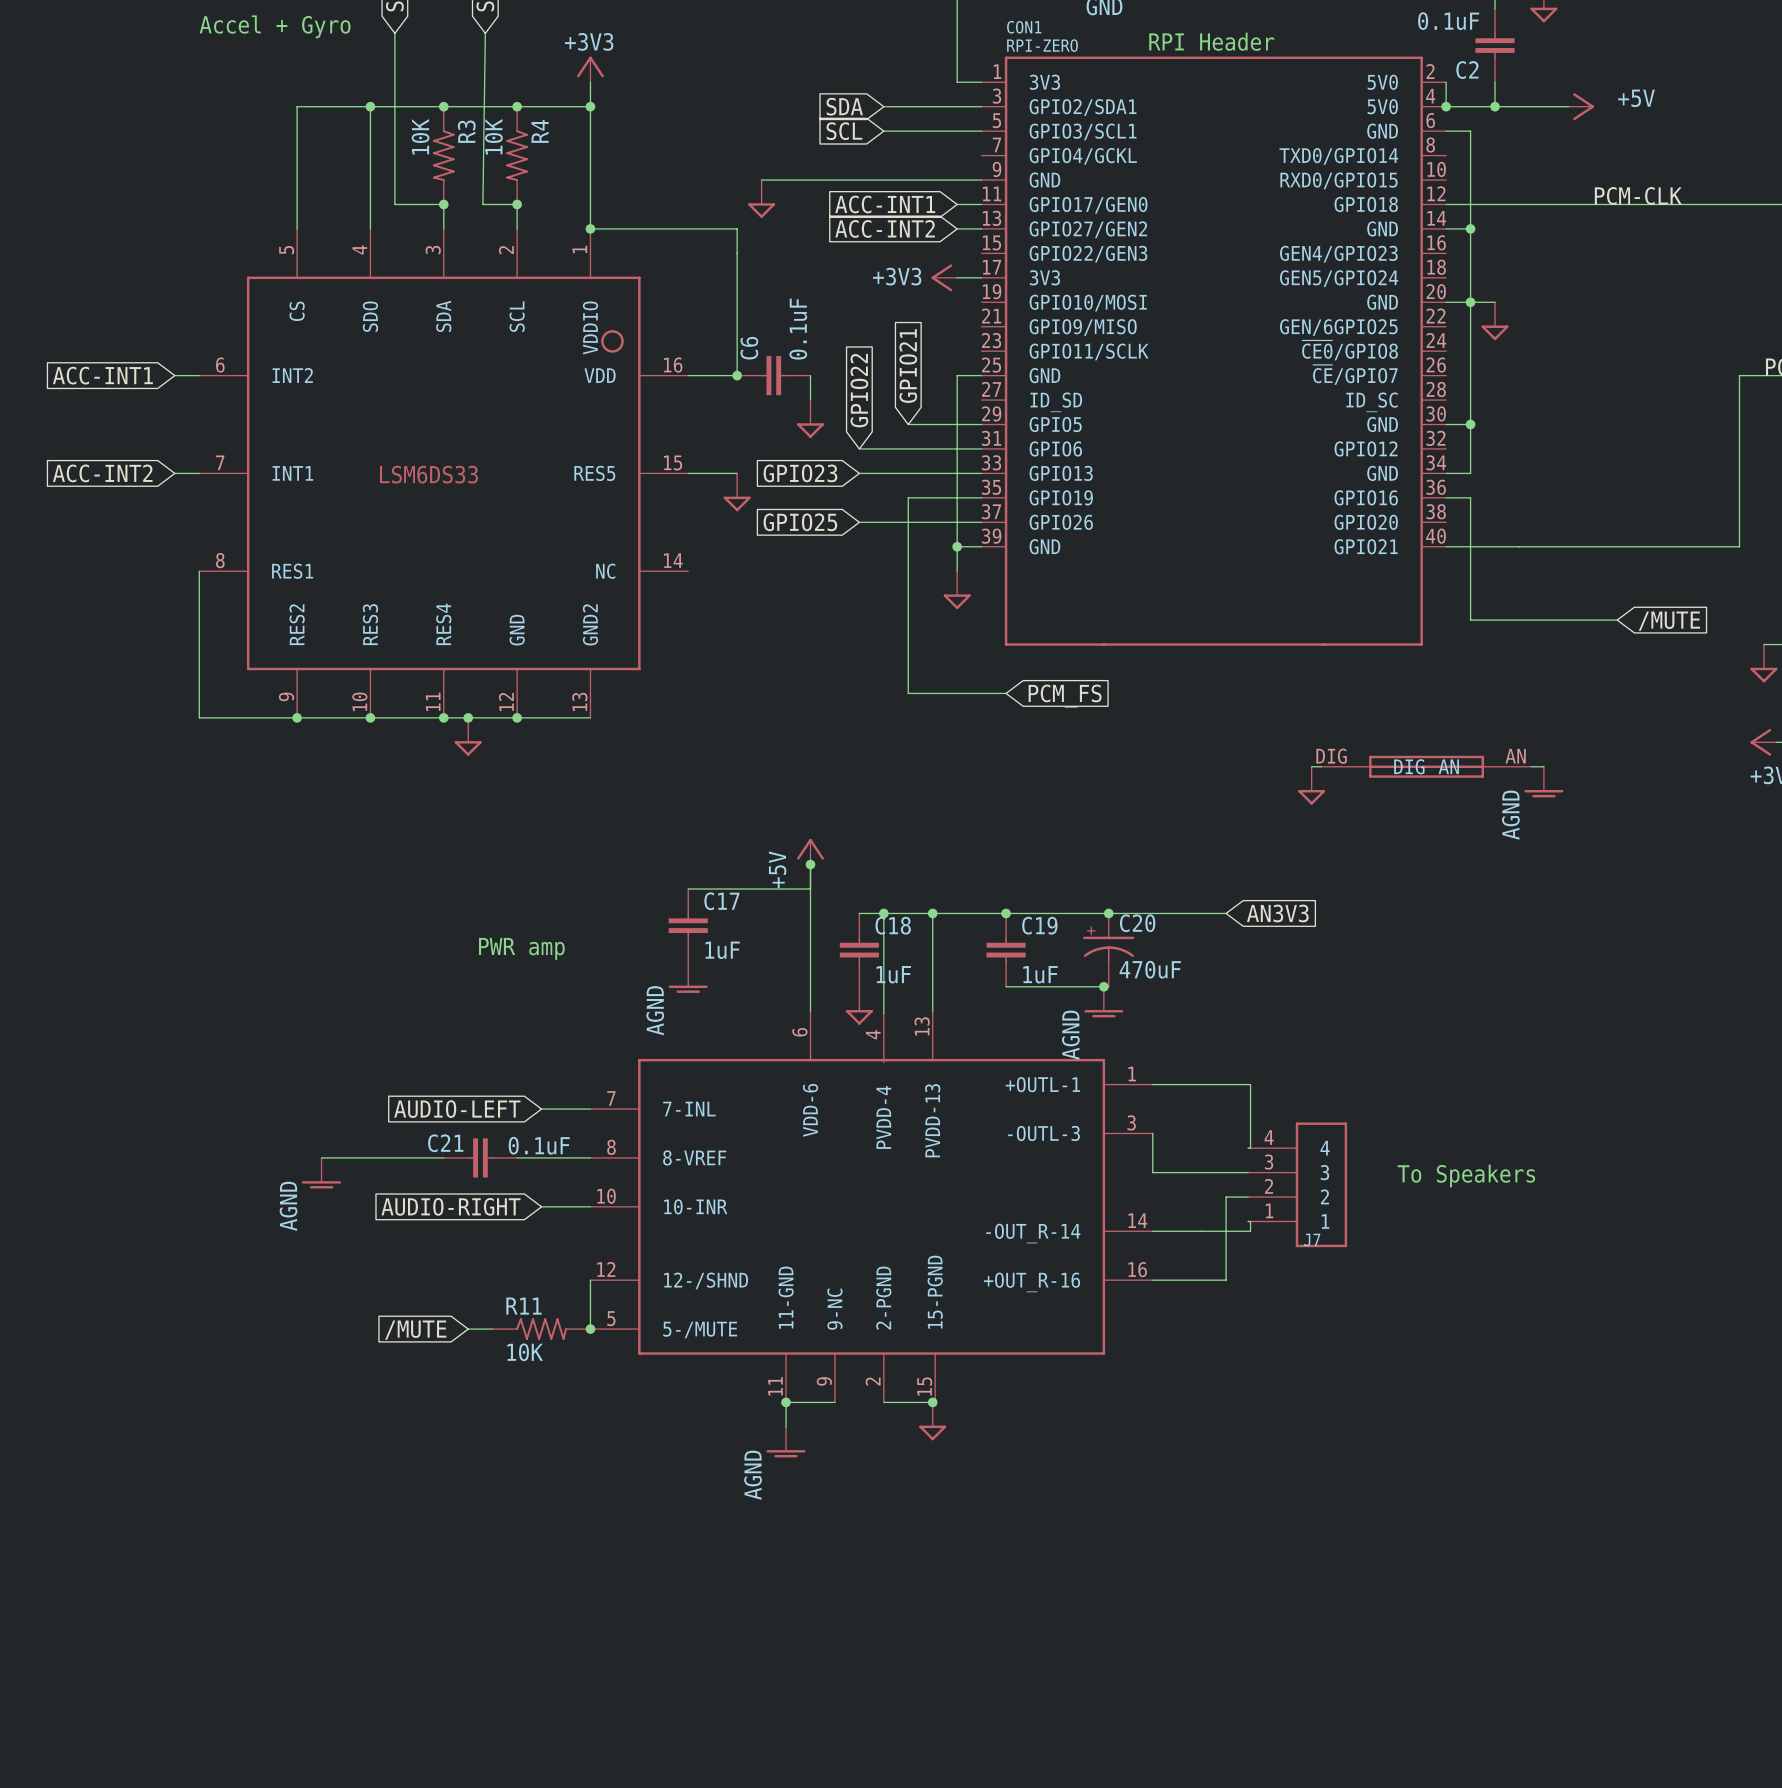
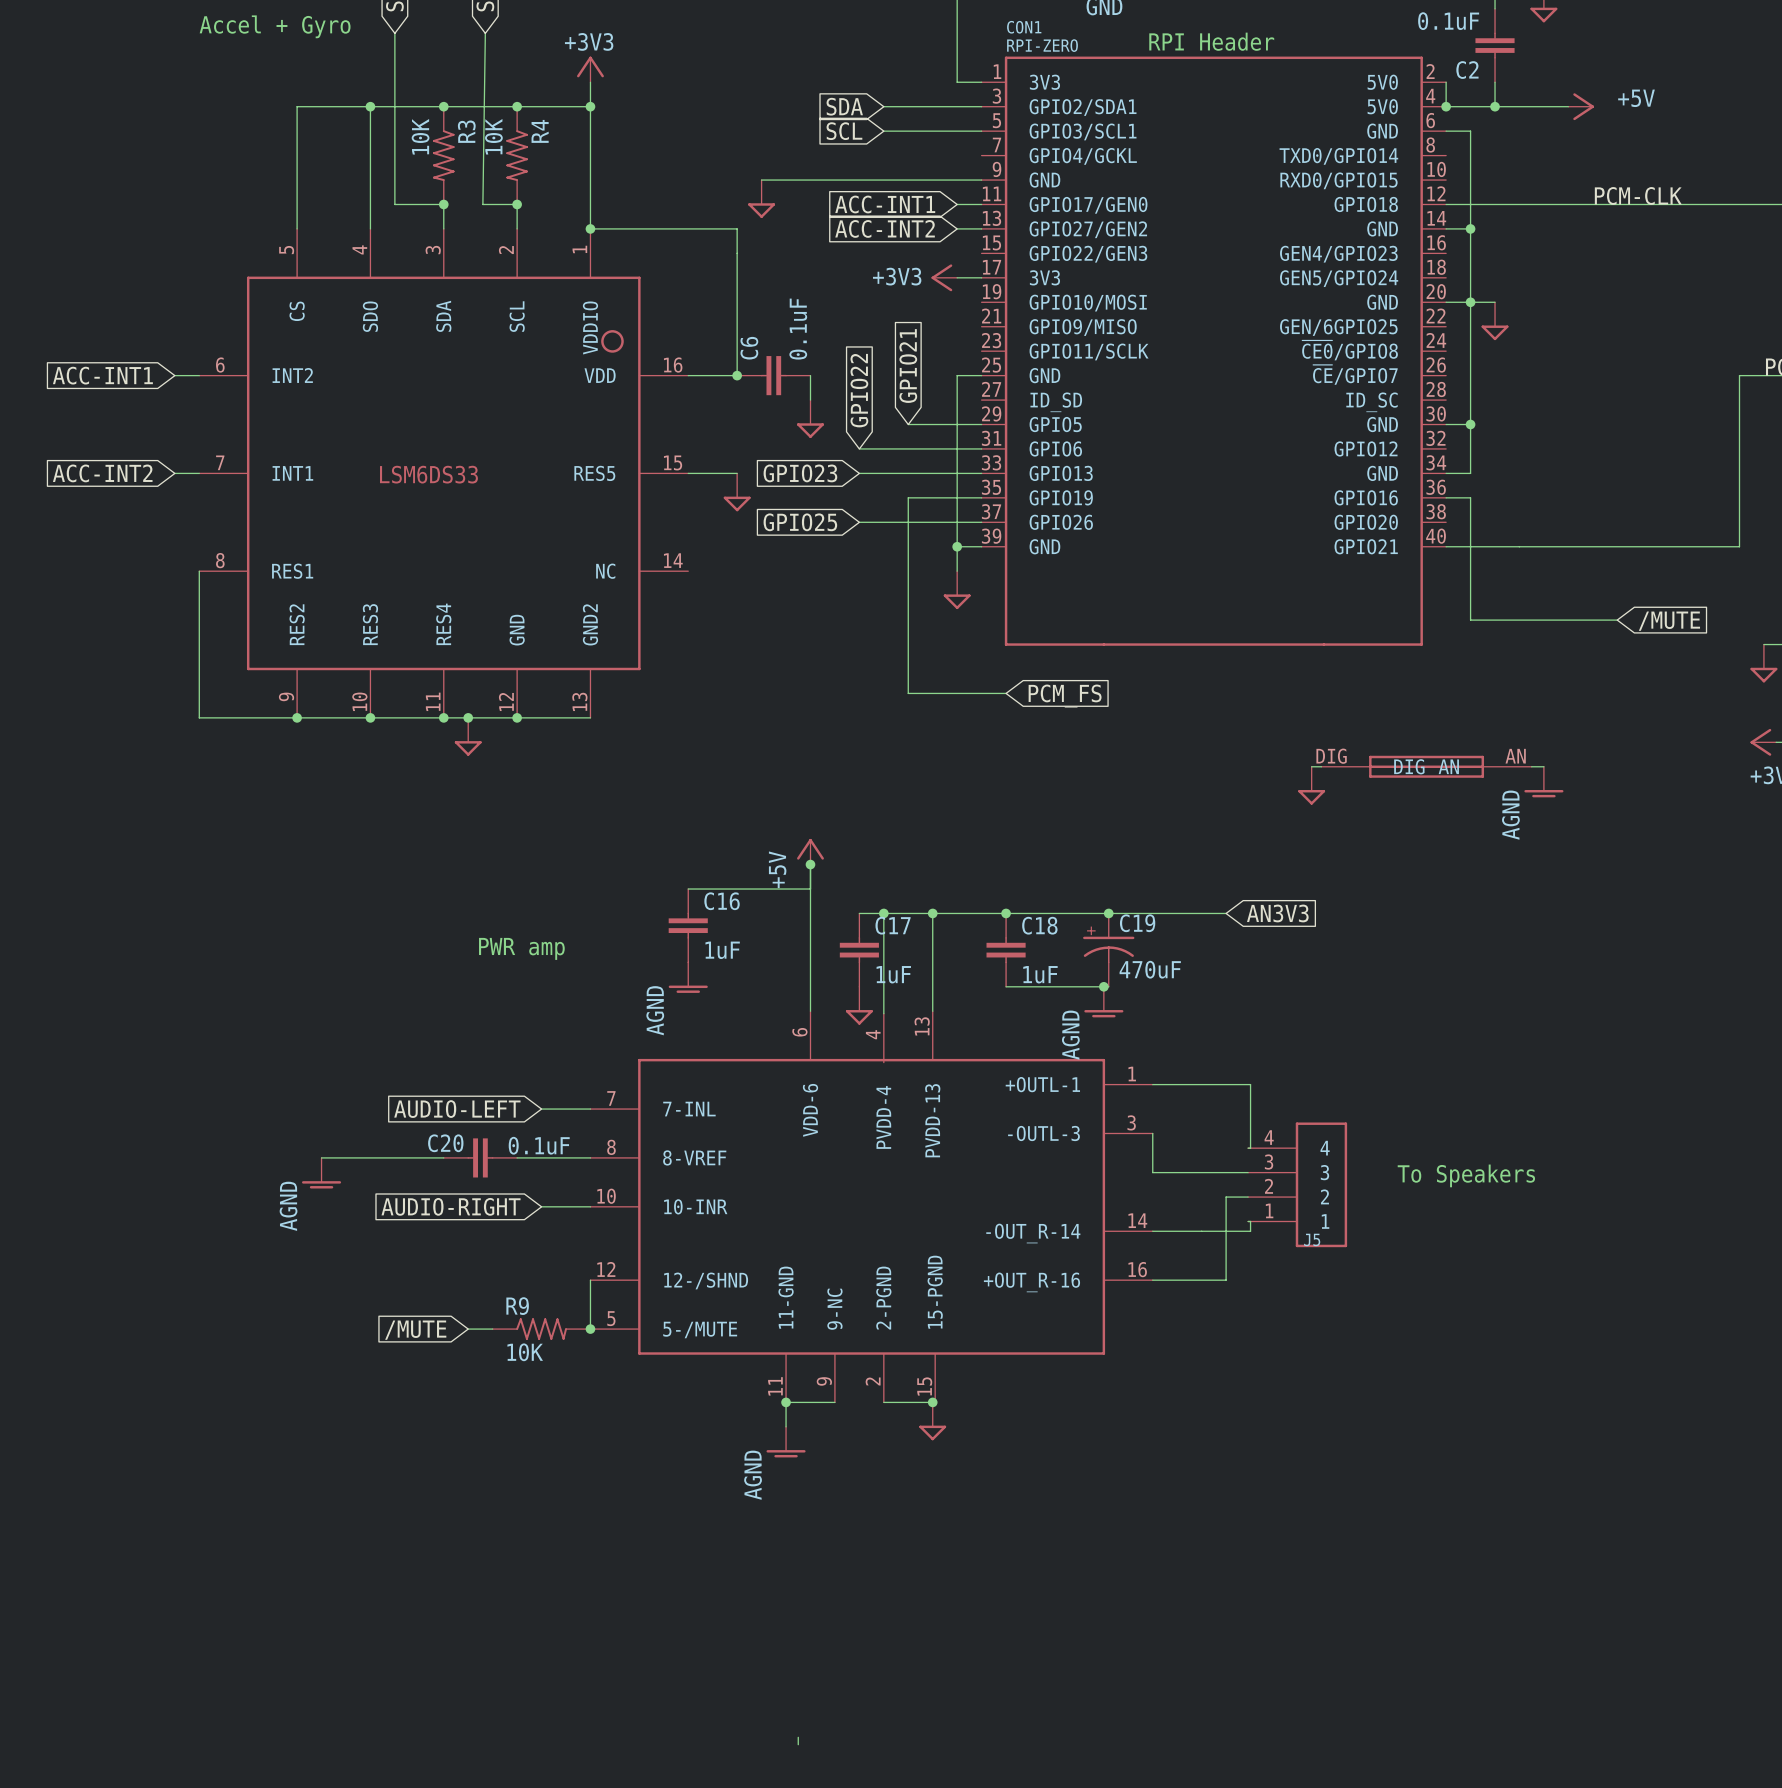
C17 name: C17 (721, 901) -> C16 (722, 901)
C20 name: C20 (1137, 923) -> C19 (1137, 923)
C18 name: C18 (893, 925) -> C17 (893, 925)
C19 name: C19 (1039, 925) -> C18 (1039, 925)
C21 name: C21 (445, 1143) -> C20 (445, 1143)
J7 name: J7 (1312, 1239) -> J5 (1312, 1239)
R11 name: R11 (523, 1306) -> R9 (517, 1306)
wire: none -> (798, 1737) (798, 1744)

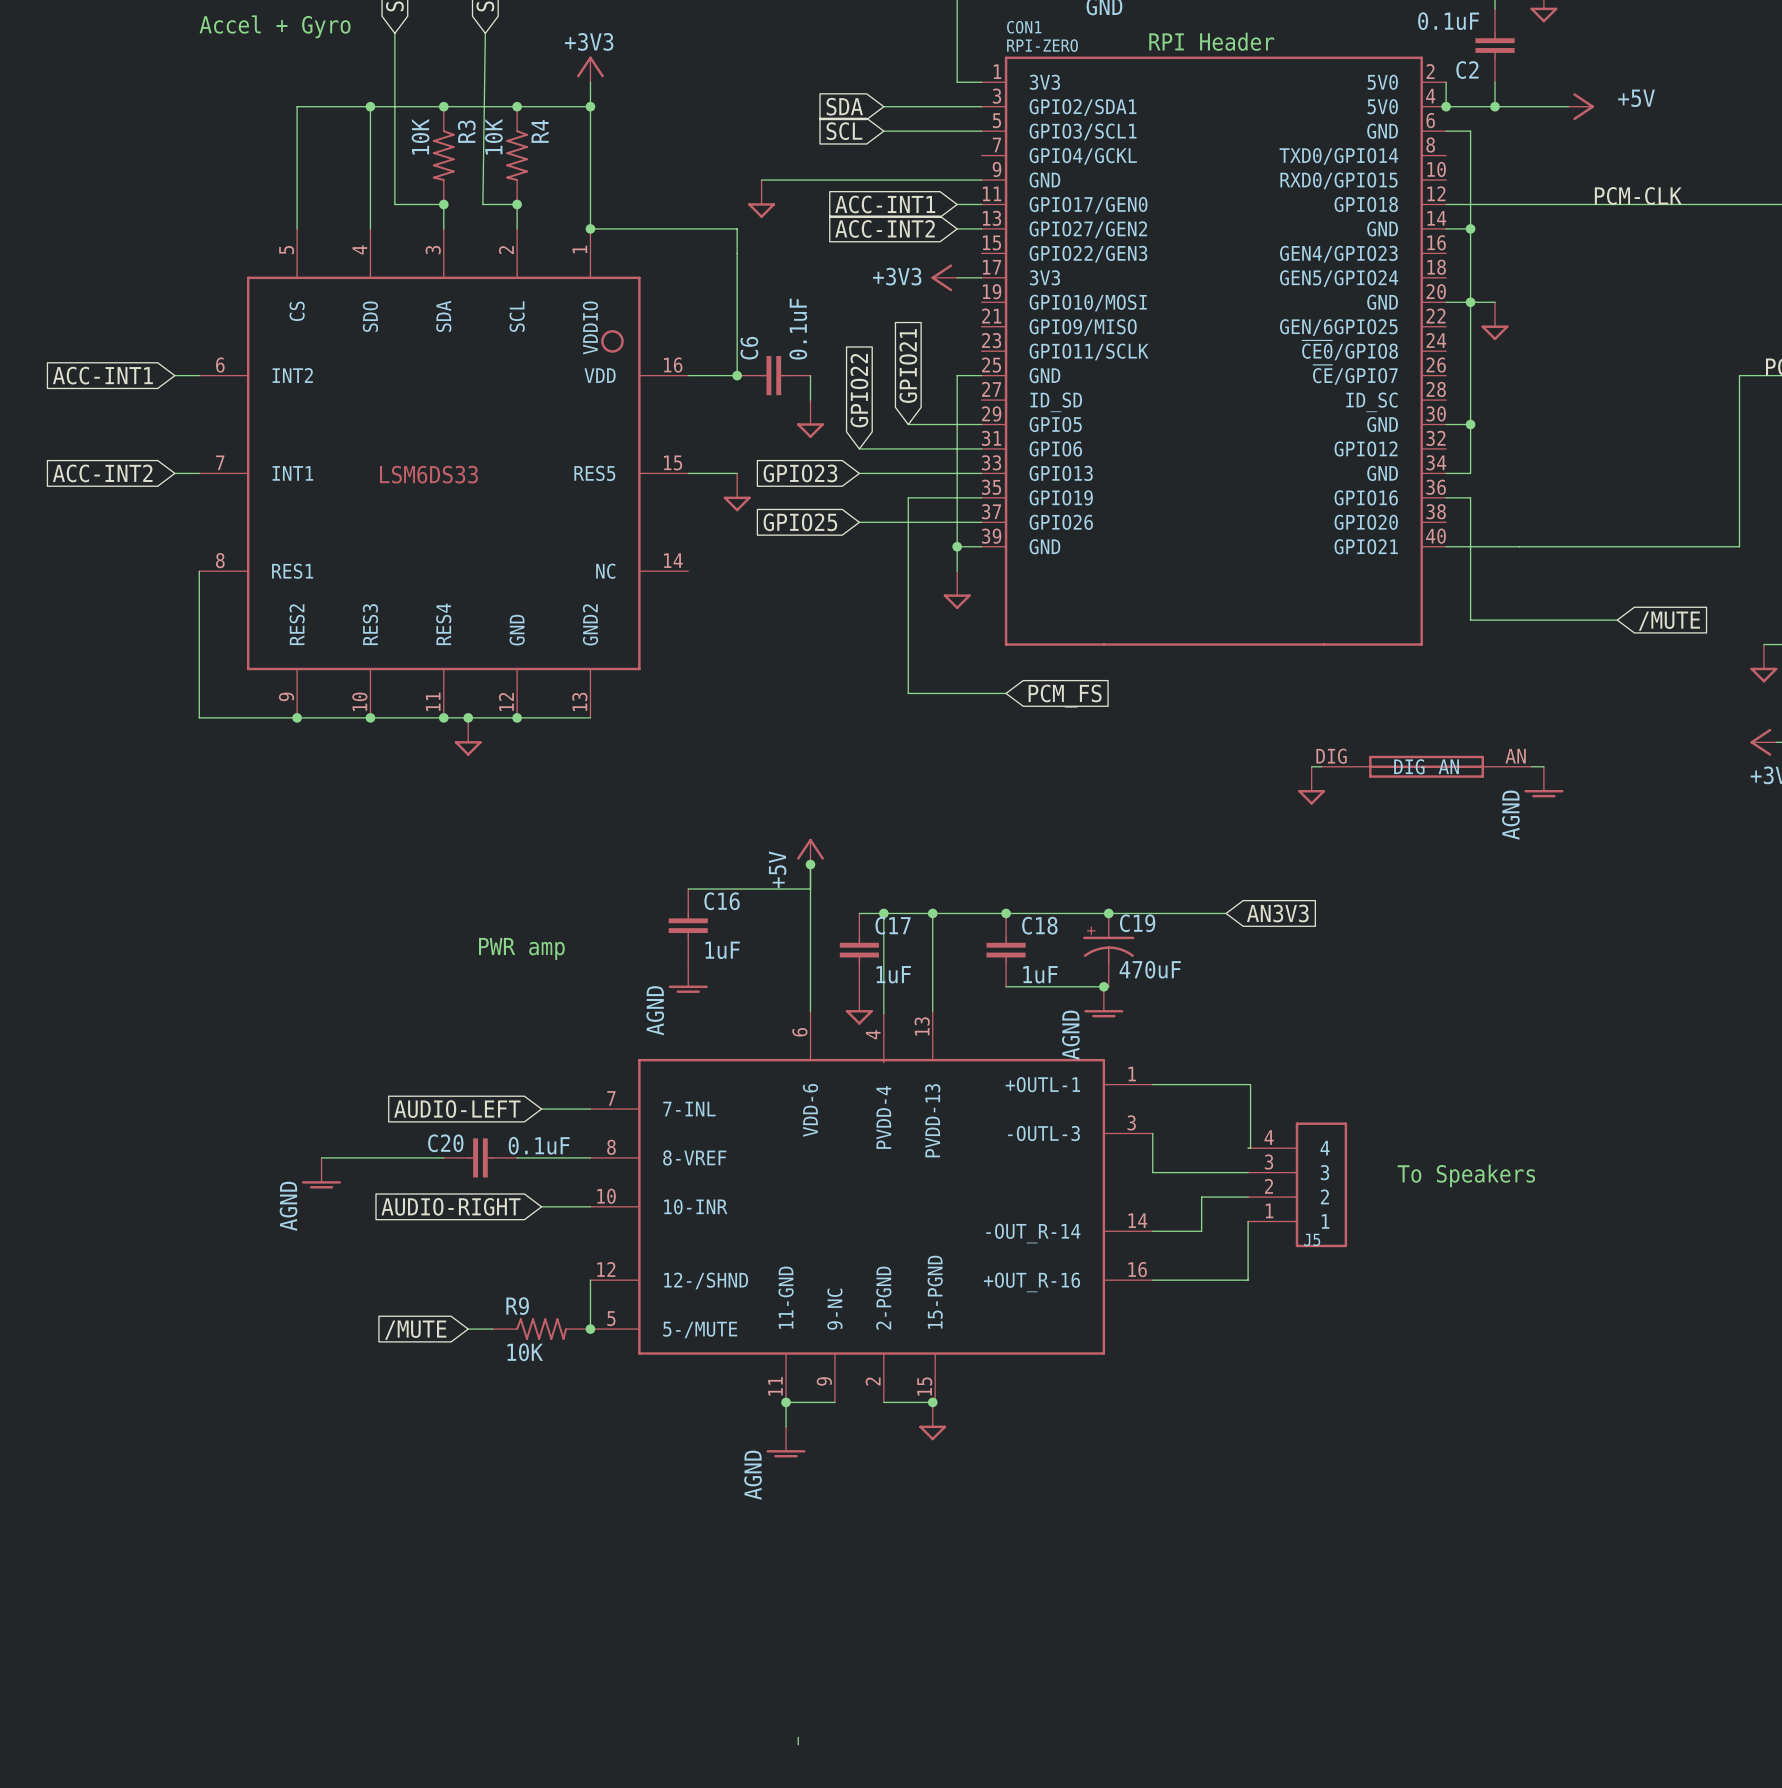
wire: (1226, 1197) (1226, 1280) -> (1248, 1221) (1248, 1280) (1226, 1280)
wire: (1248, 1221) (1250, 1221) (1250, 1231) (1201, 1231) -> (1226, 1197) (1201, 1197) (1201, 1231)

